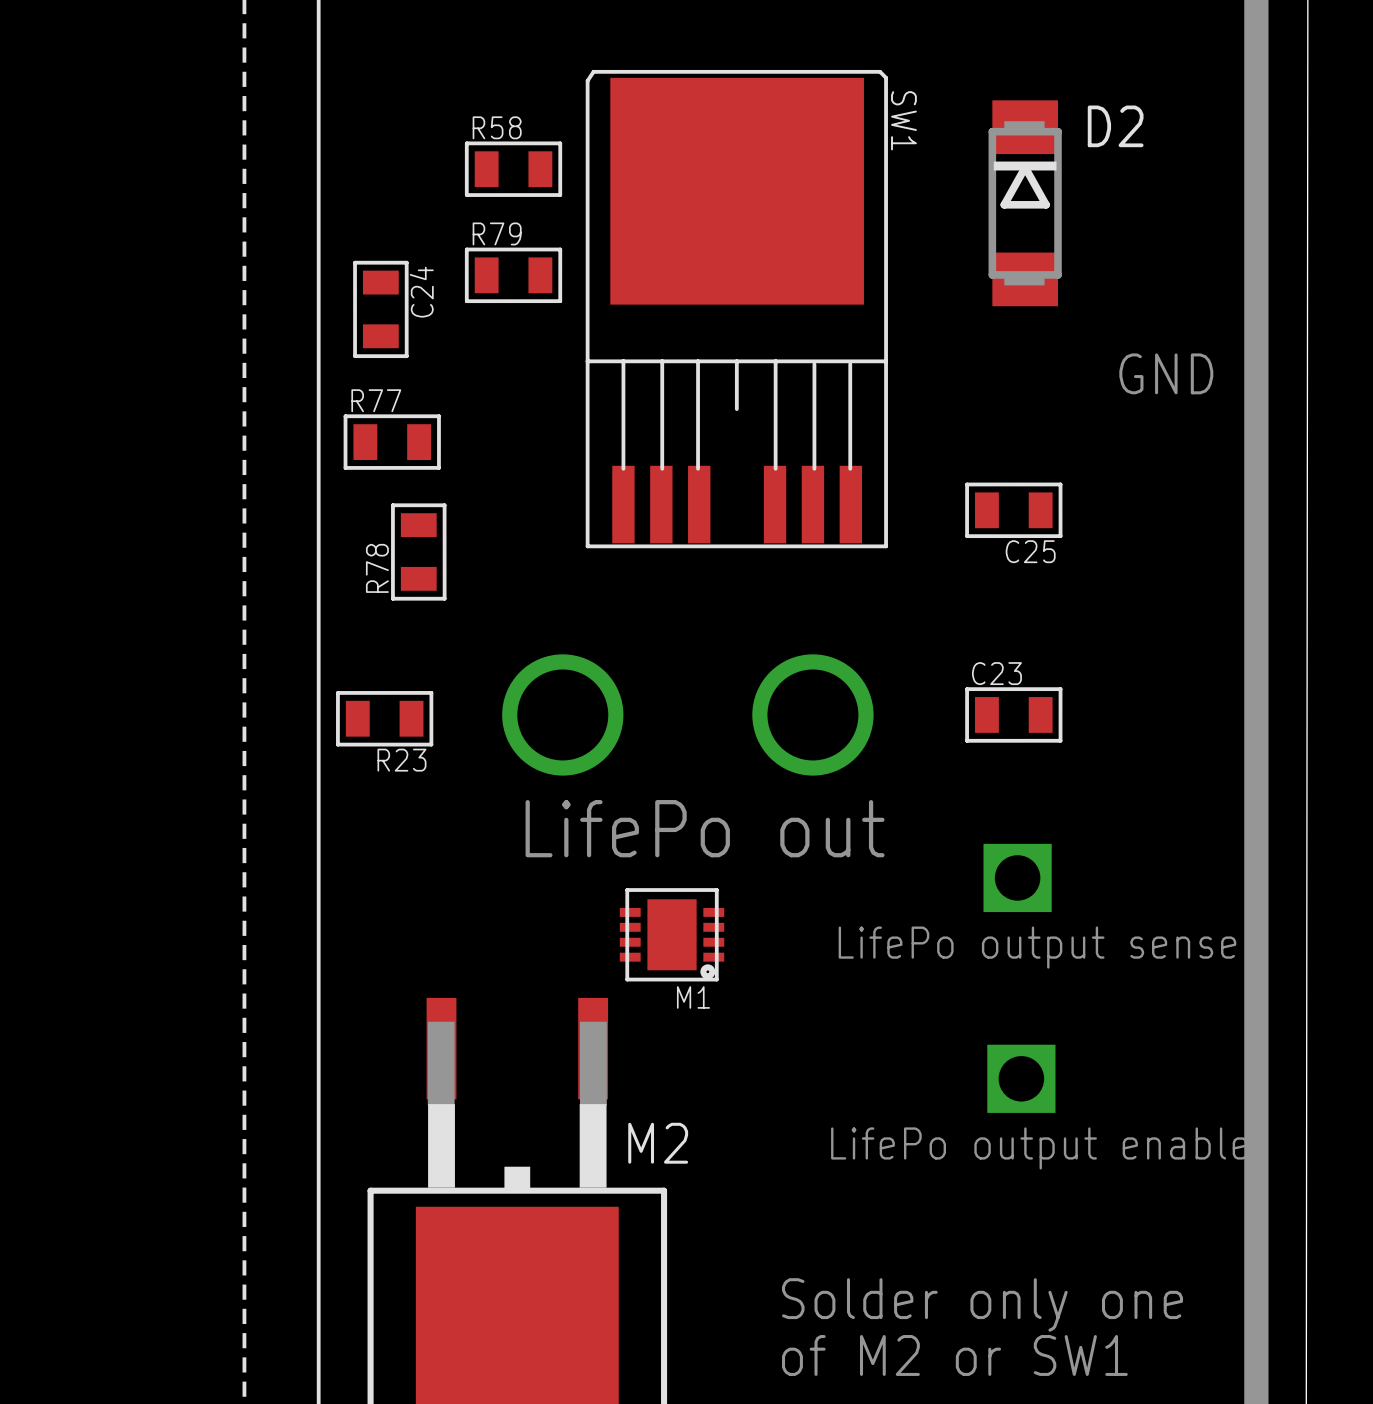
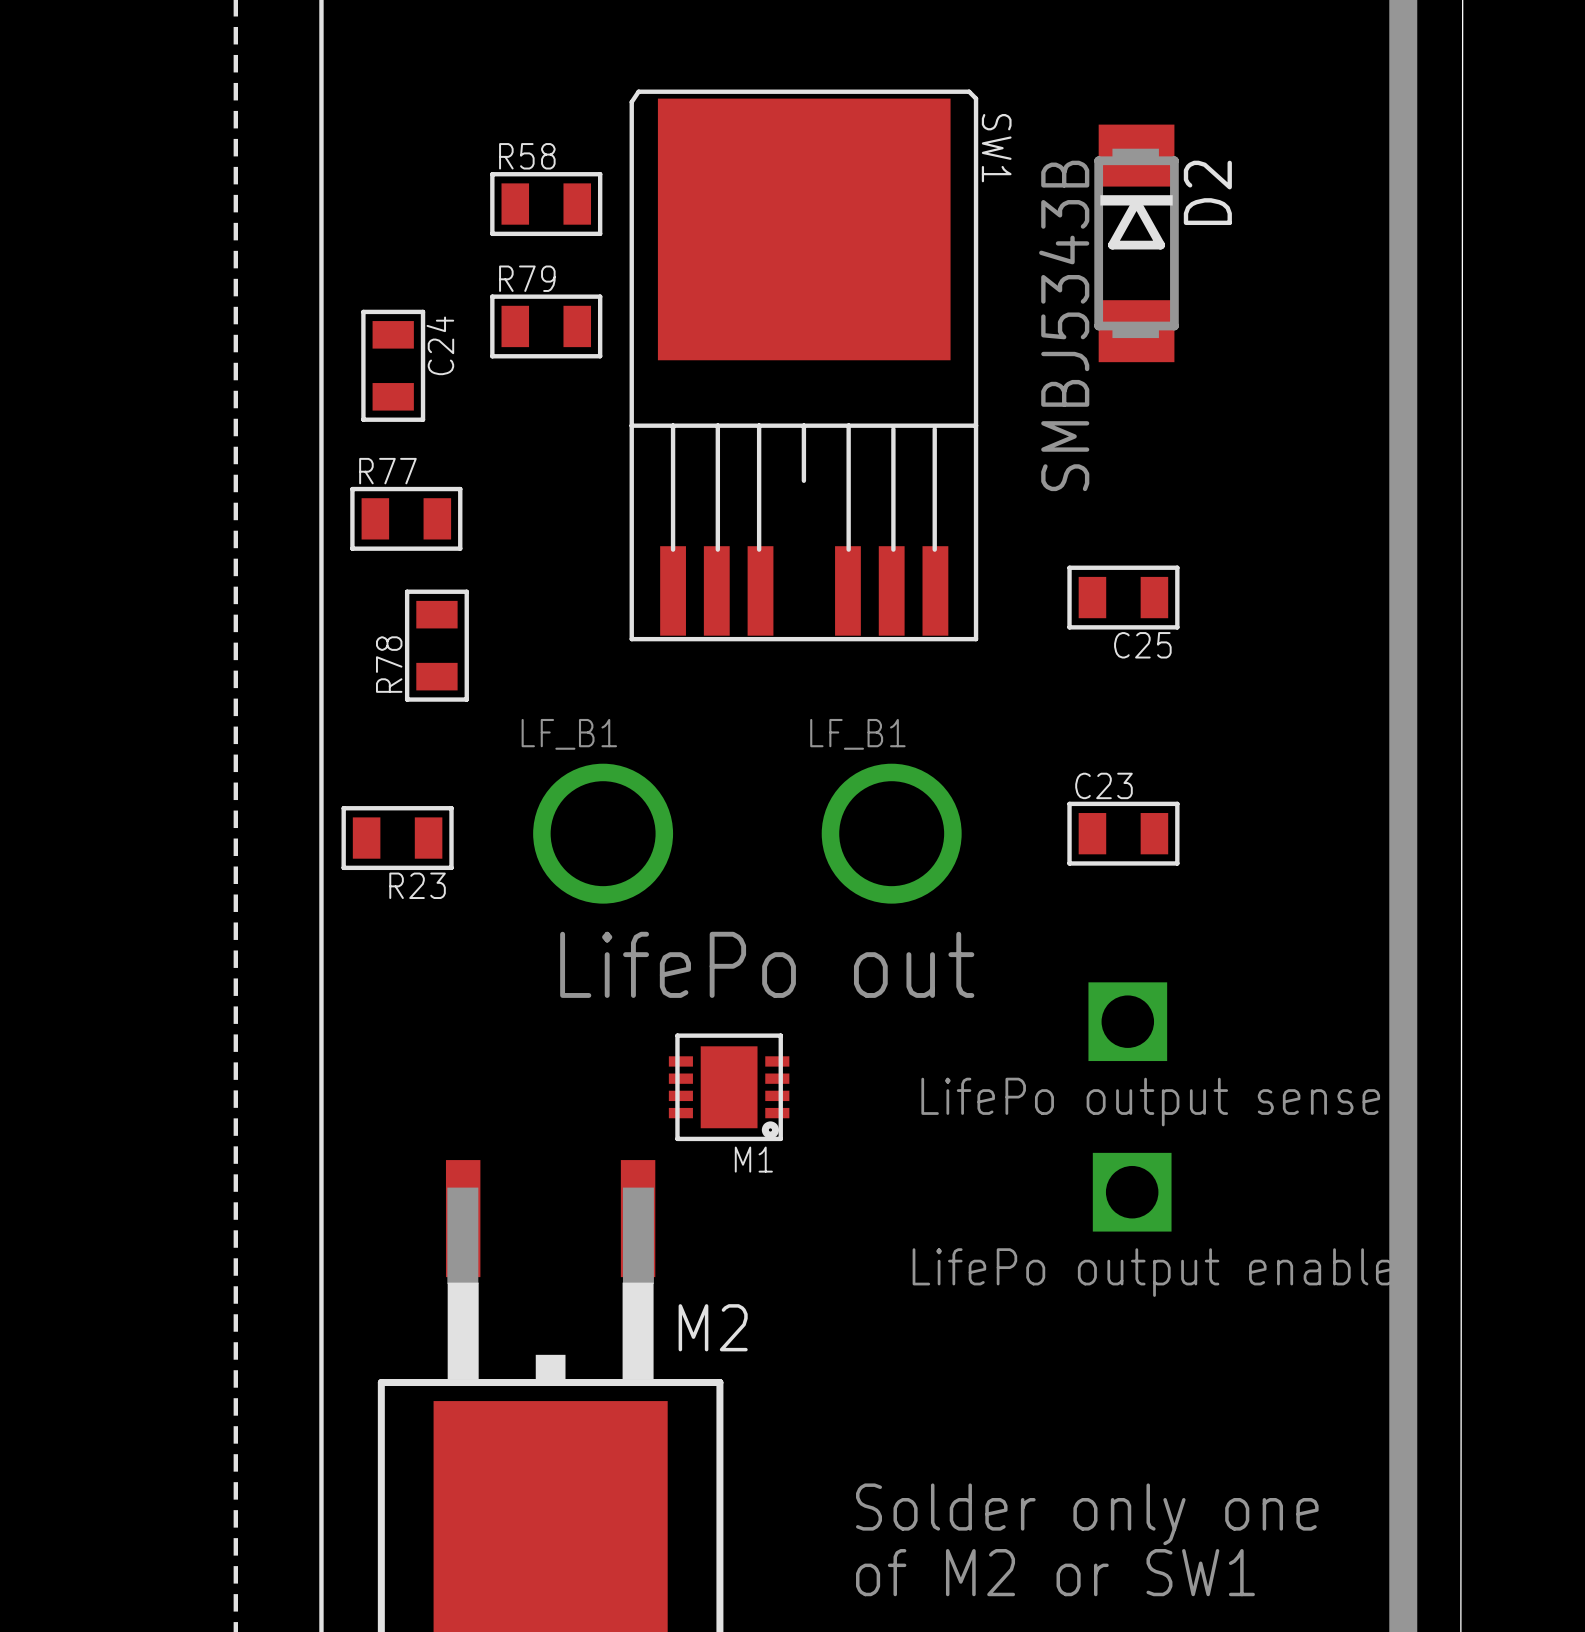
D2 name rotation: 0° (1115, 126) -> 90° counterclockwise (1207, 192)
D2 value: none -> SMBJ5343B (1064, 325)
text: GND (1166, 373) -> none
part value: none -> LF_B1 (569, 734)
part value: none -> LF_B1 (857, 734)
part position: (1021, 1078) -> (1132, 1192)

